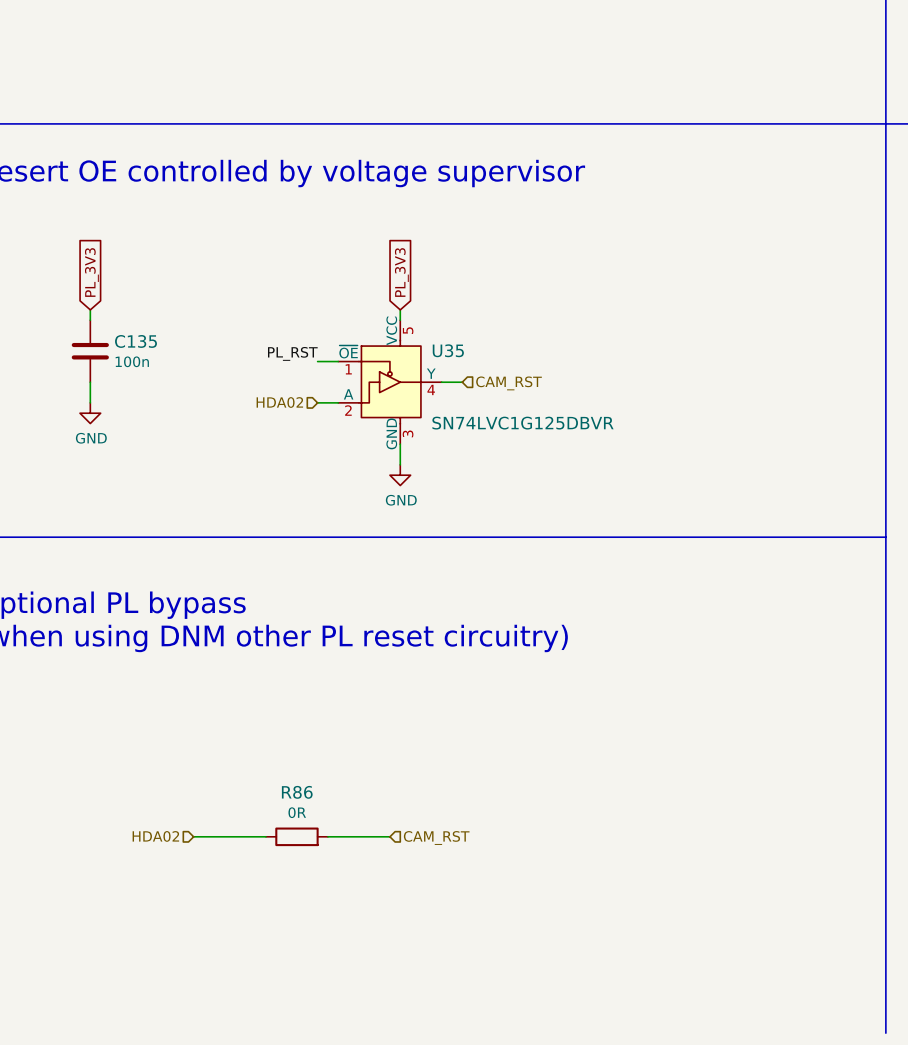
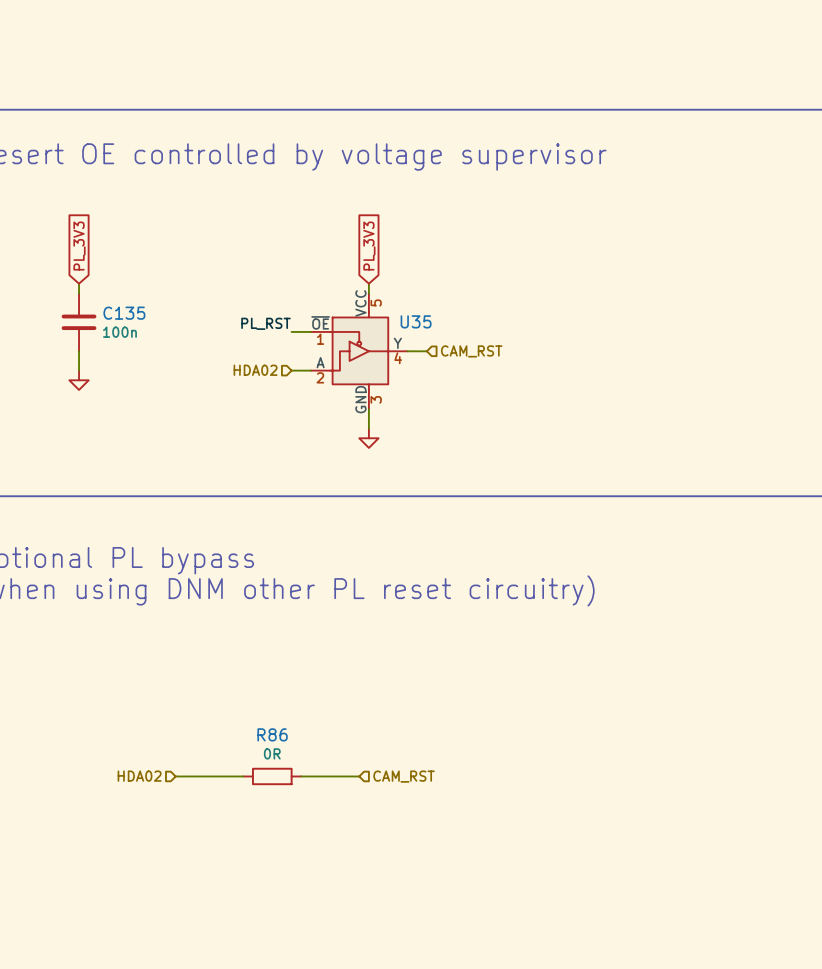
U35 value: SN74LVC1G125DBVR (522, 423) -> none
power symbol text: GND (91, 438) -> none
power symbol text: GND (401, 500) -> none

